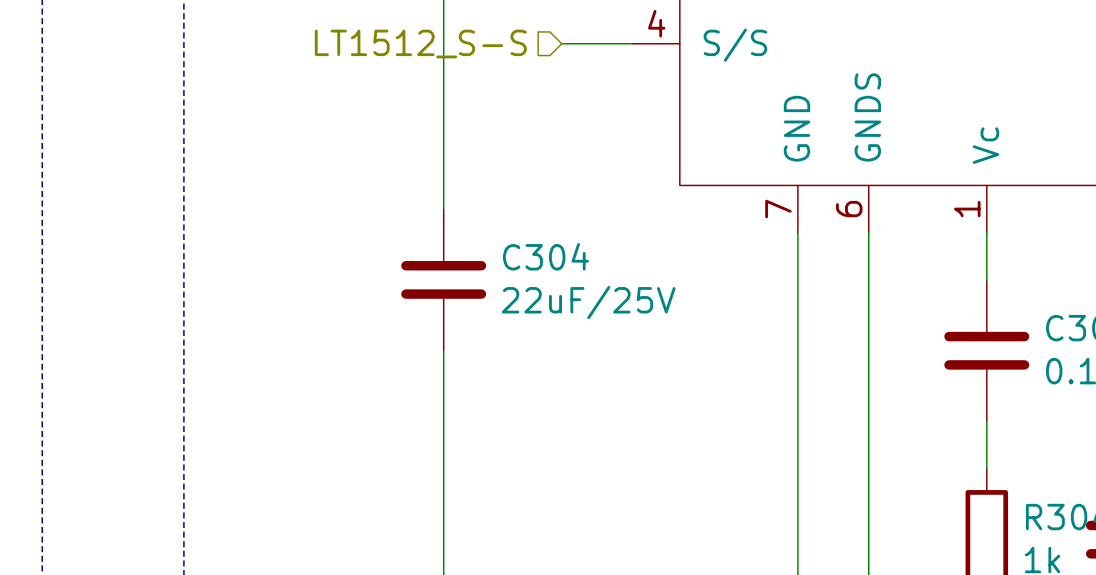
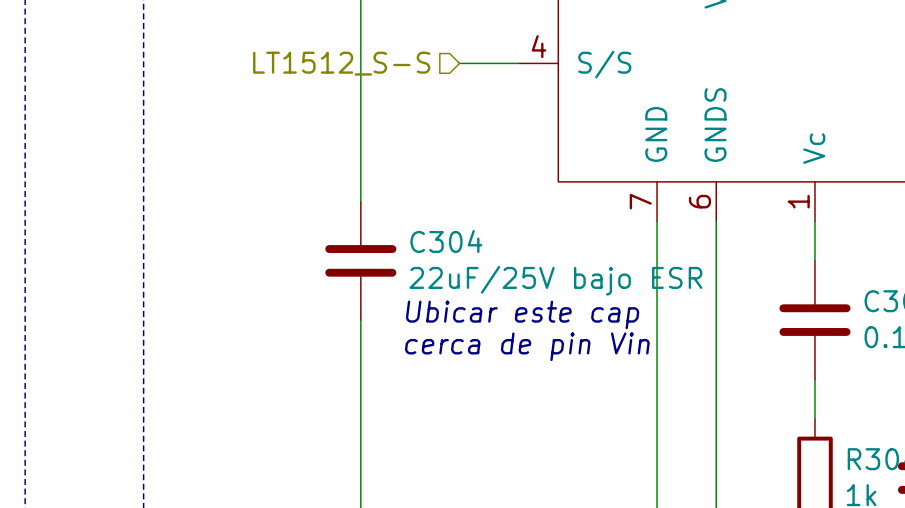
C304 value: 22uF/25V (588, 302) -> 22uF/25V bajo ESR (555, 280)
text: none -> Ubicar este cap (522, 314)
text: none -> cerca de pin Vin (527, 346)

